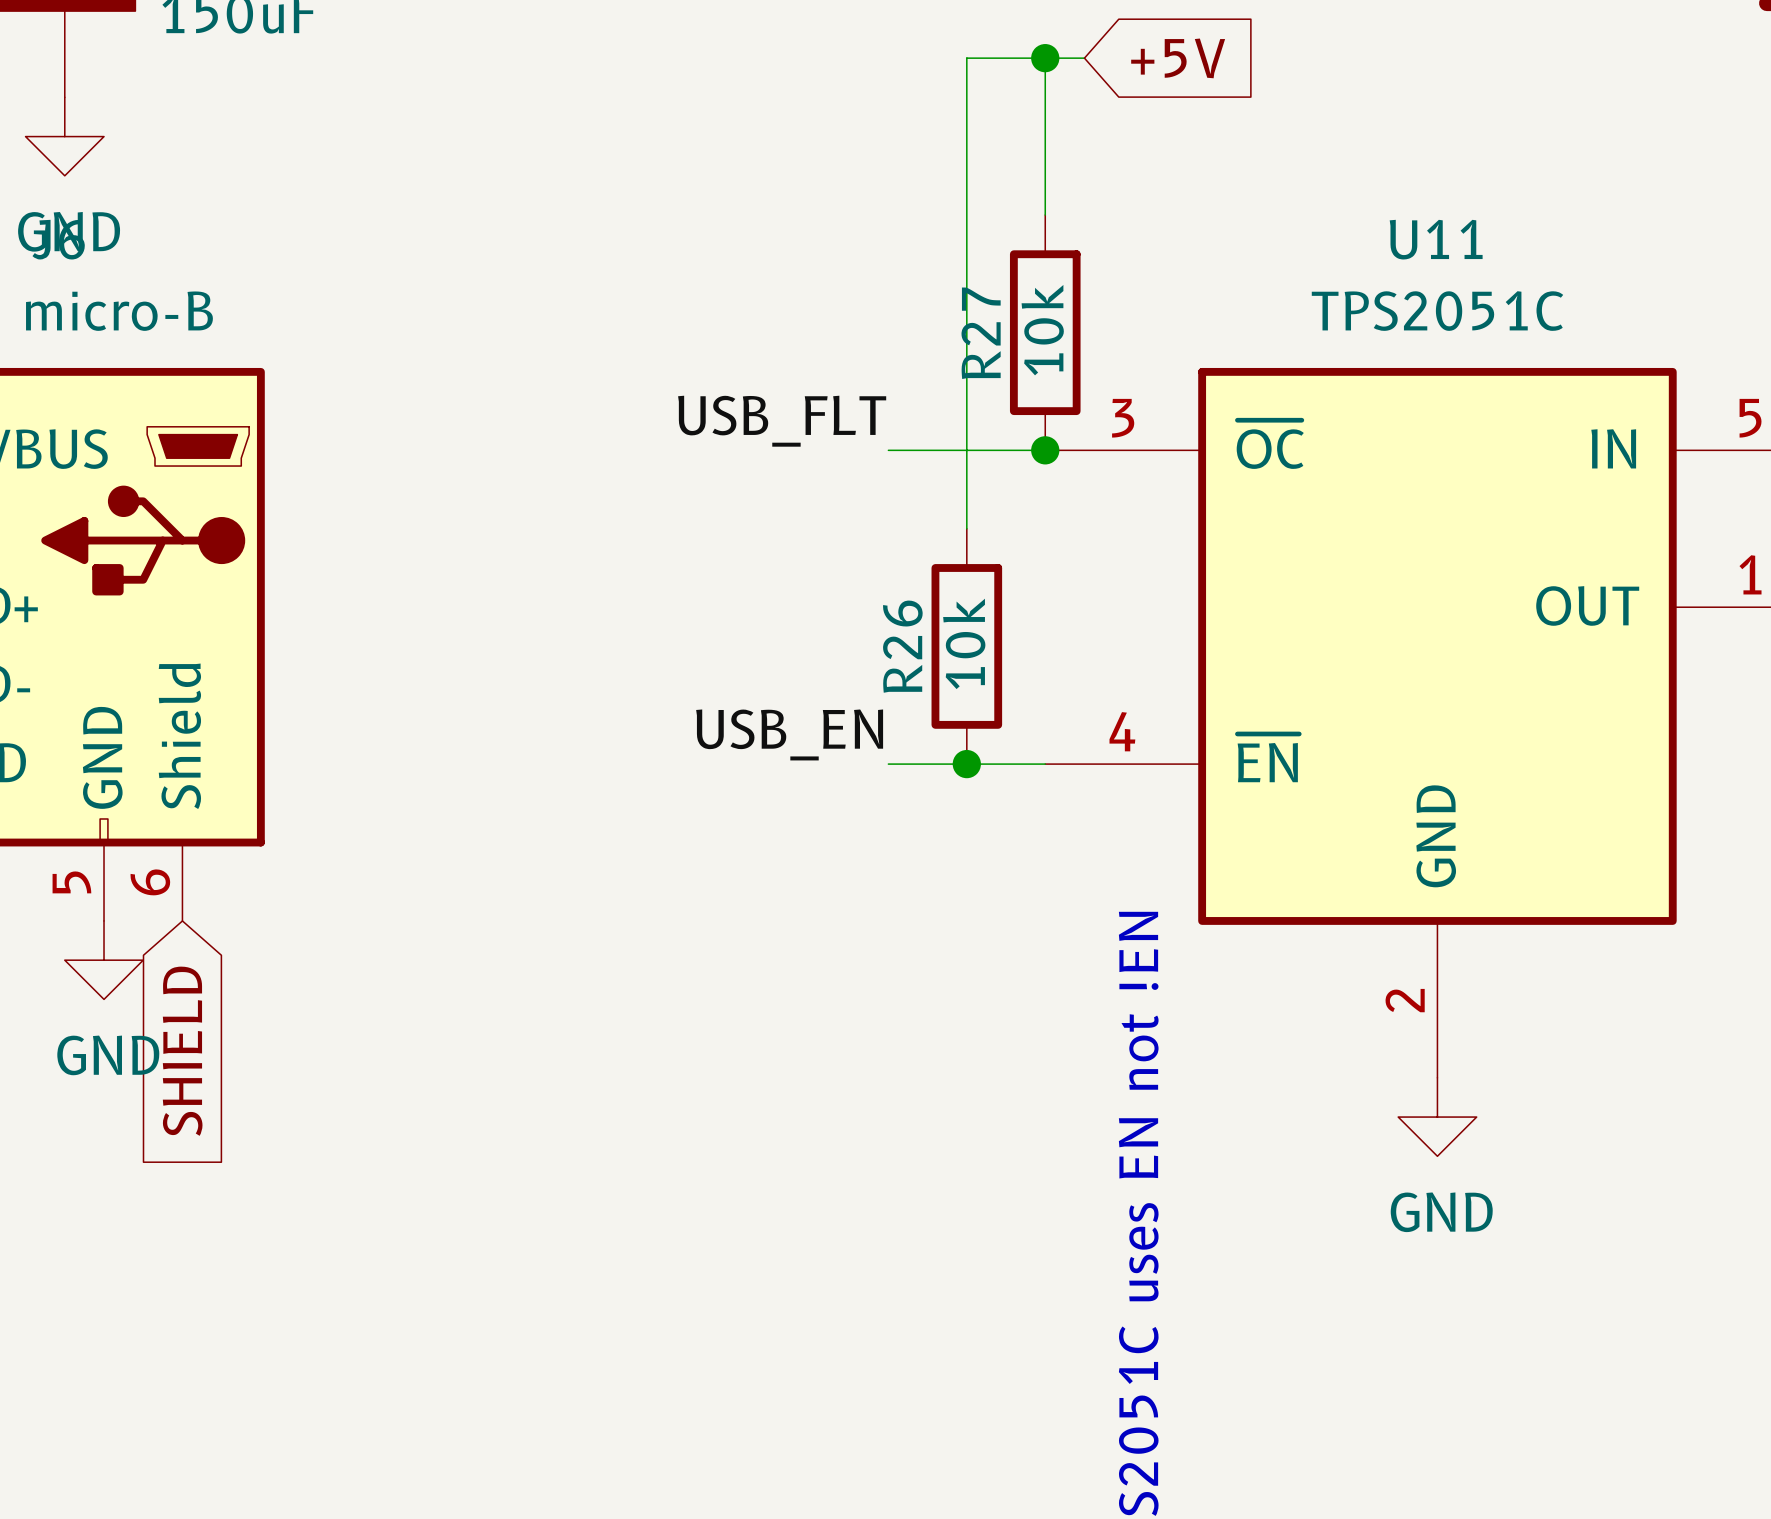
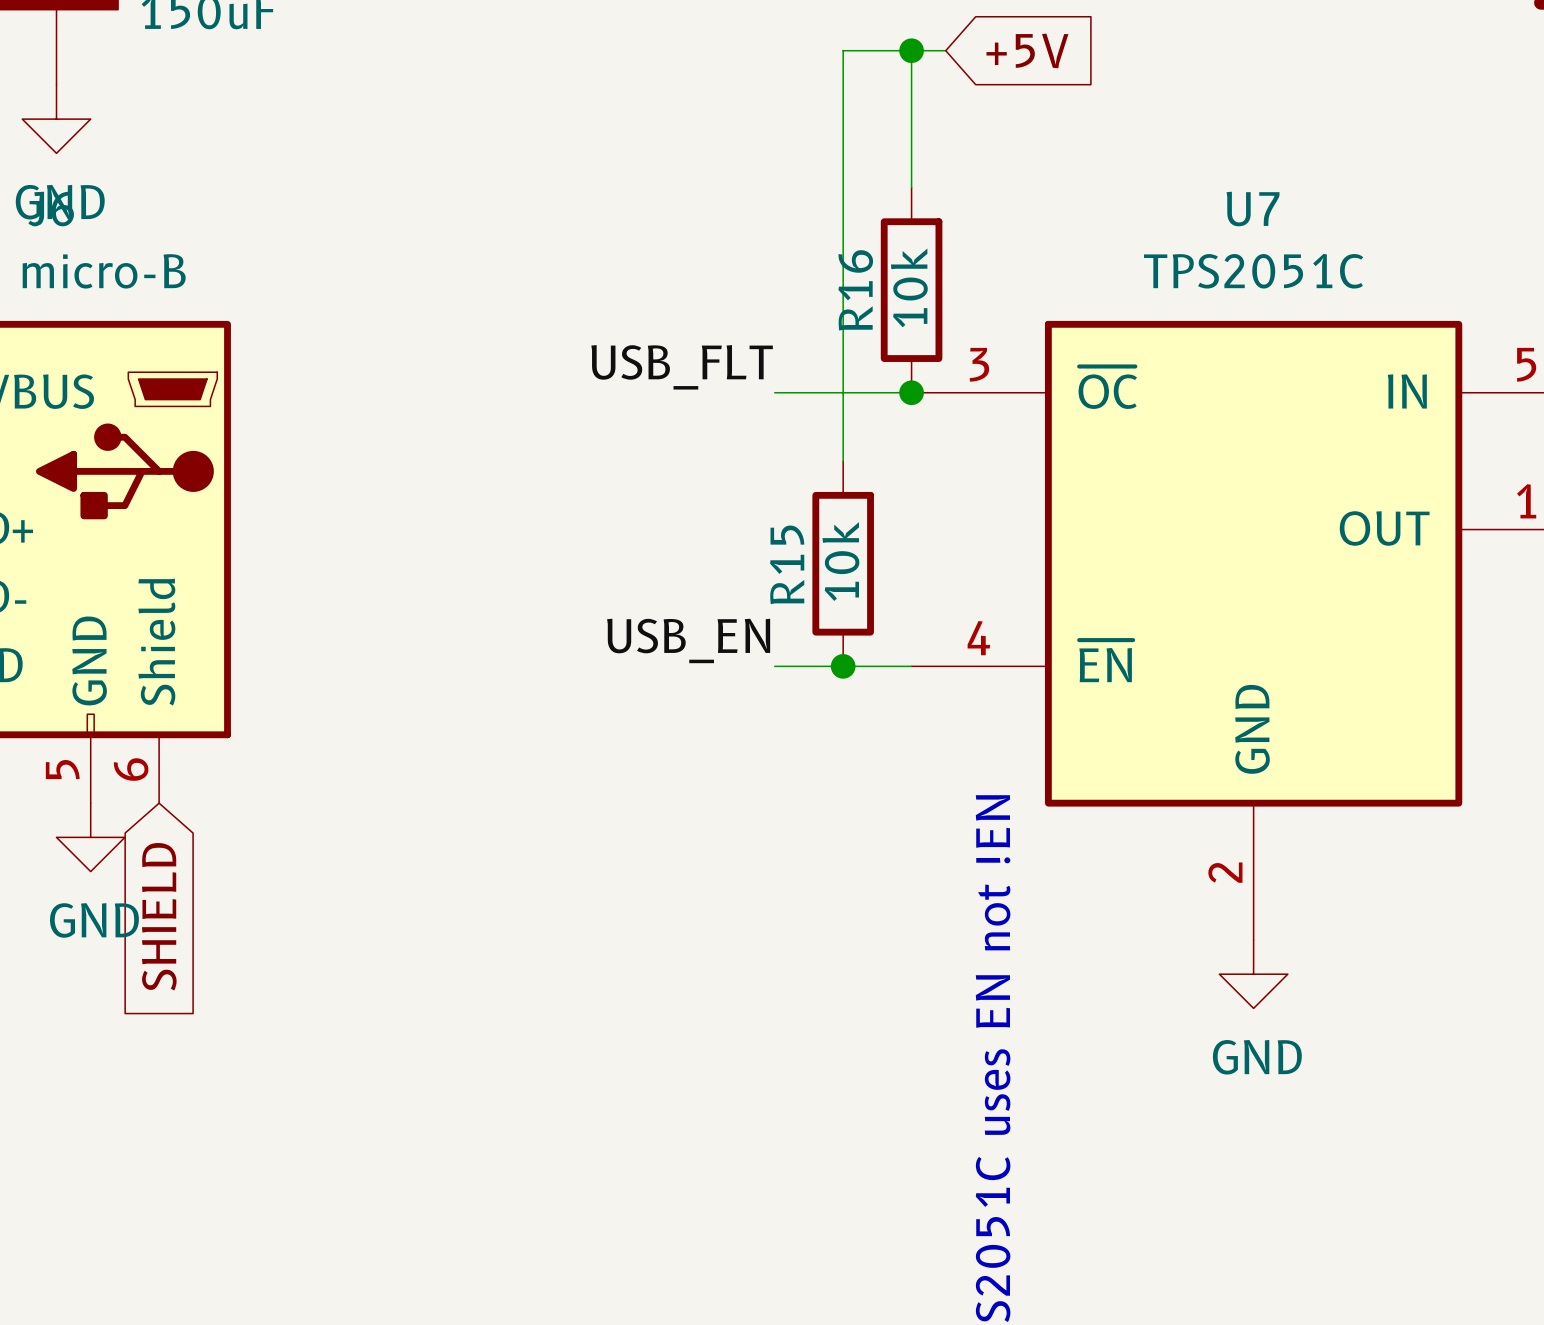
U11 name: U11 (1436, 239) -> U7 (1253, 209)
R27 name: R27 (981, 333) -> R16 (855, 290)
R26 name: R26 (902, 646) -> R15 (787, 564)

